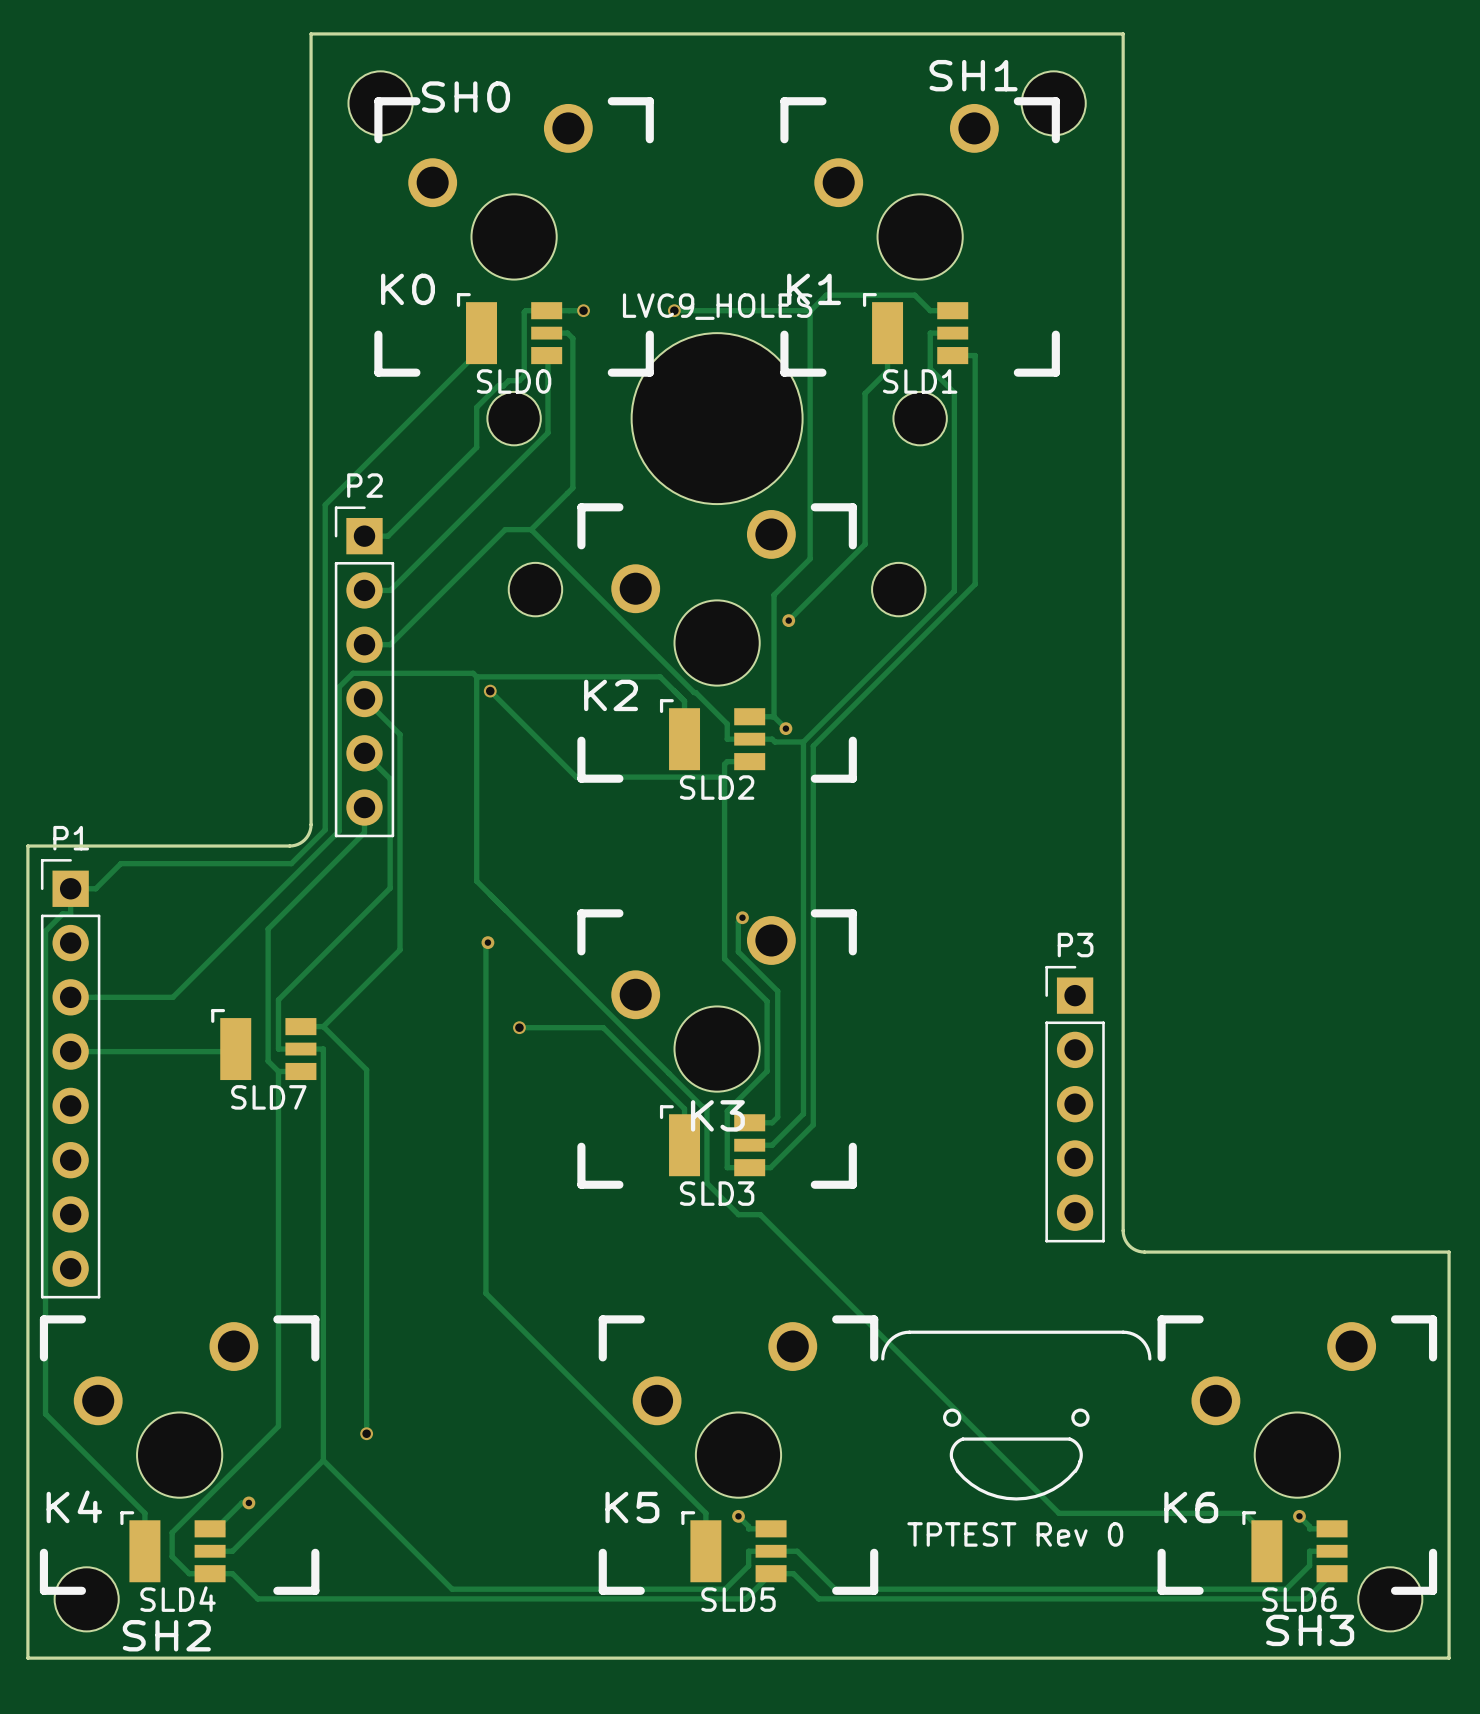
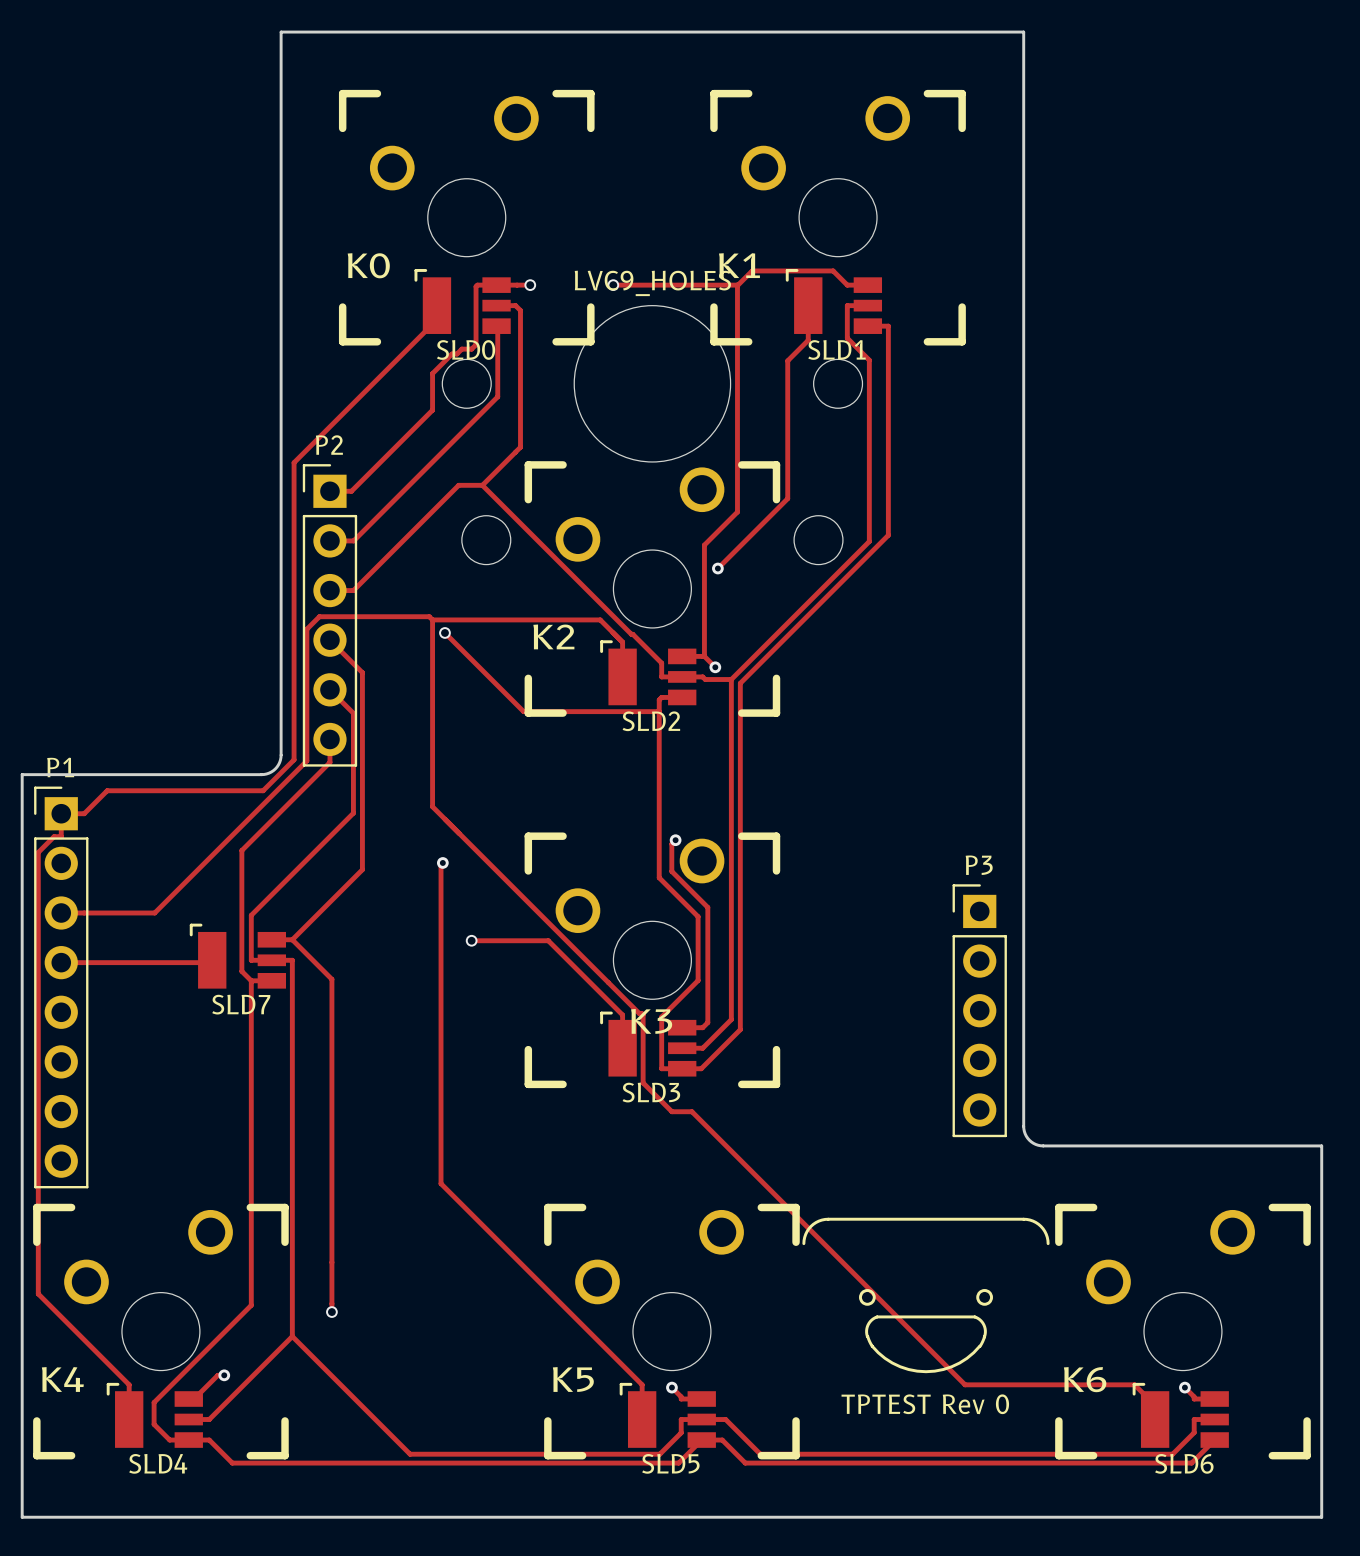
SH0: (380, 103) -> none
SH1: (1053, 103) -> none
SH2: (86, 1599) -> none
SH3: (1390, 1599) -> none

